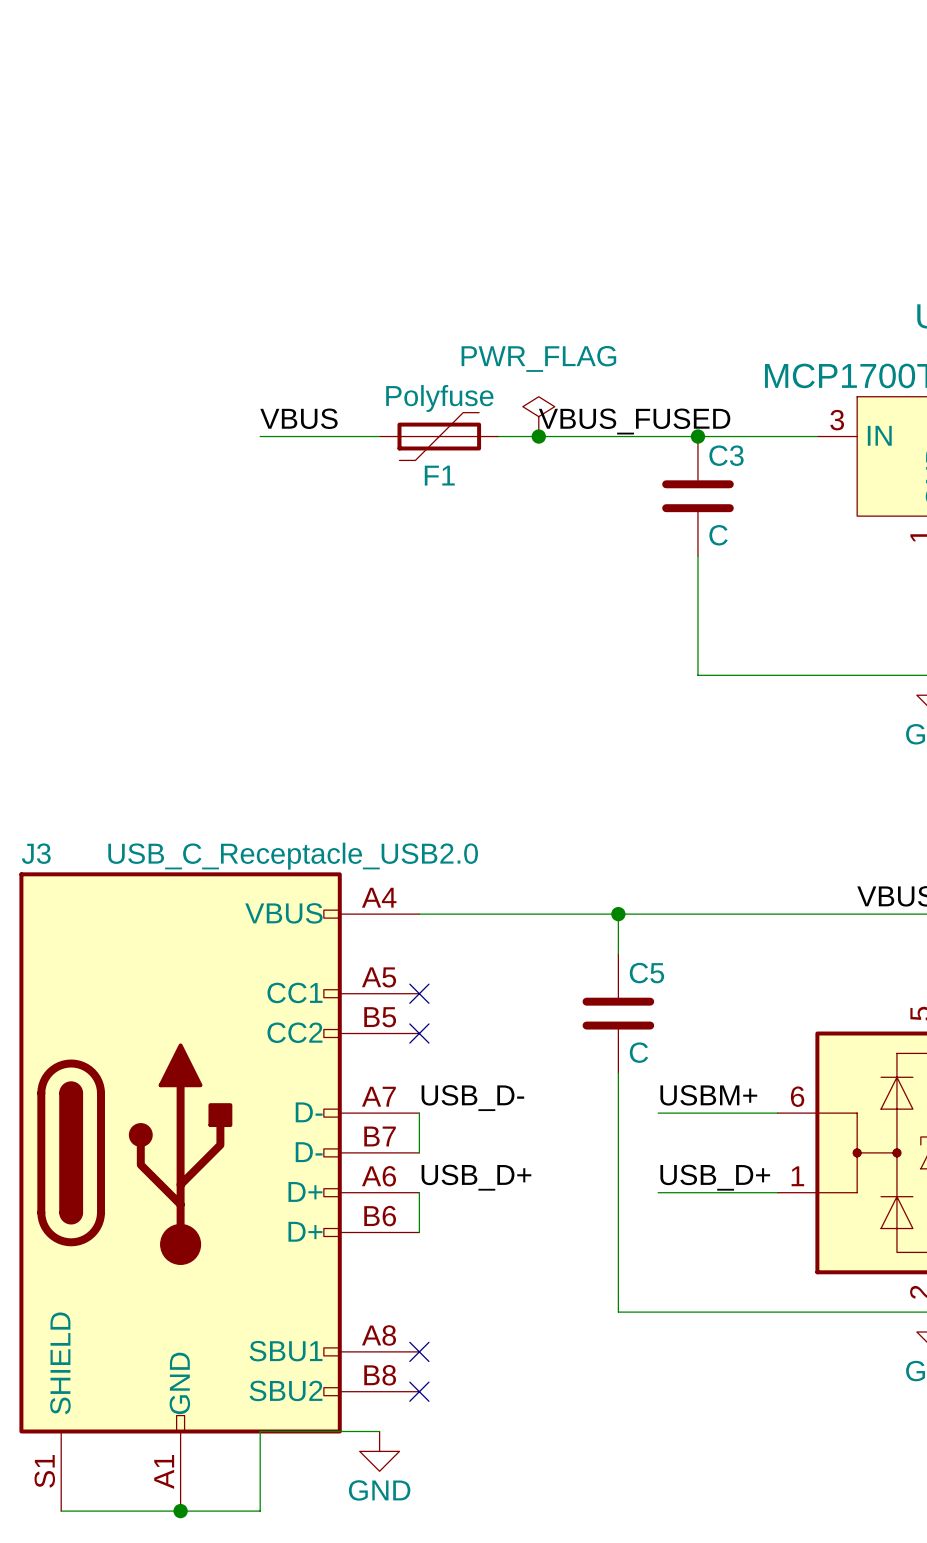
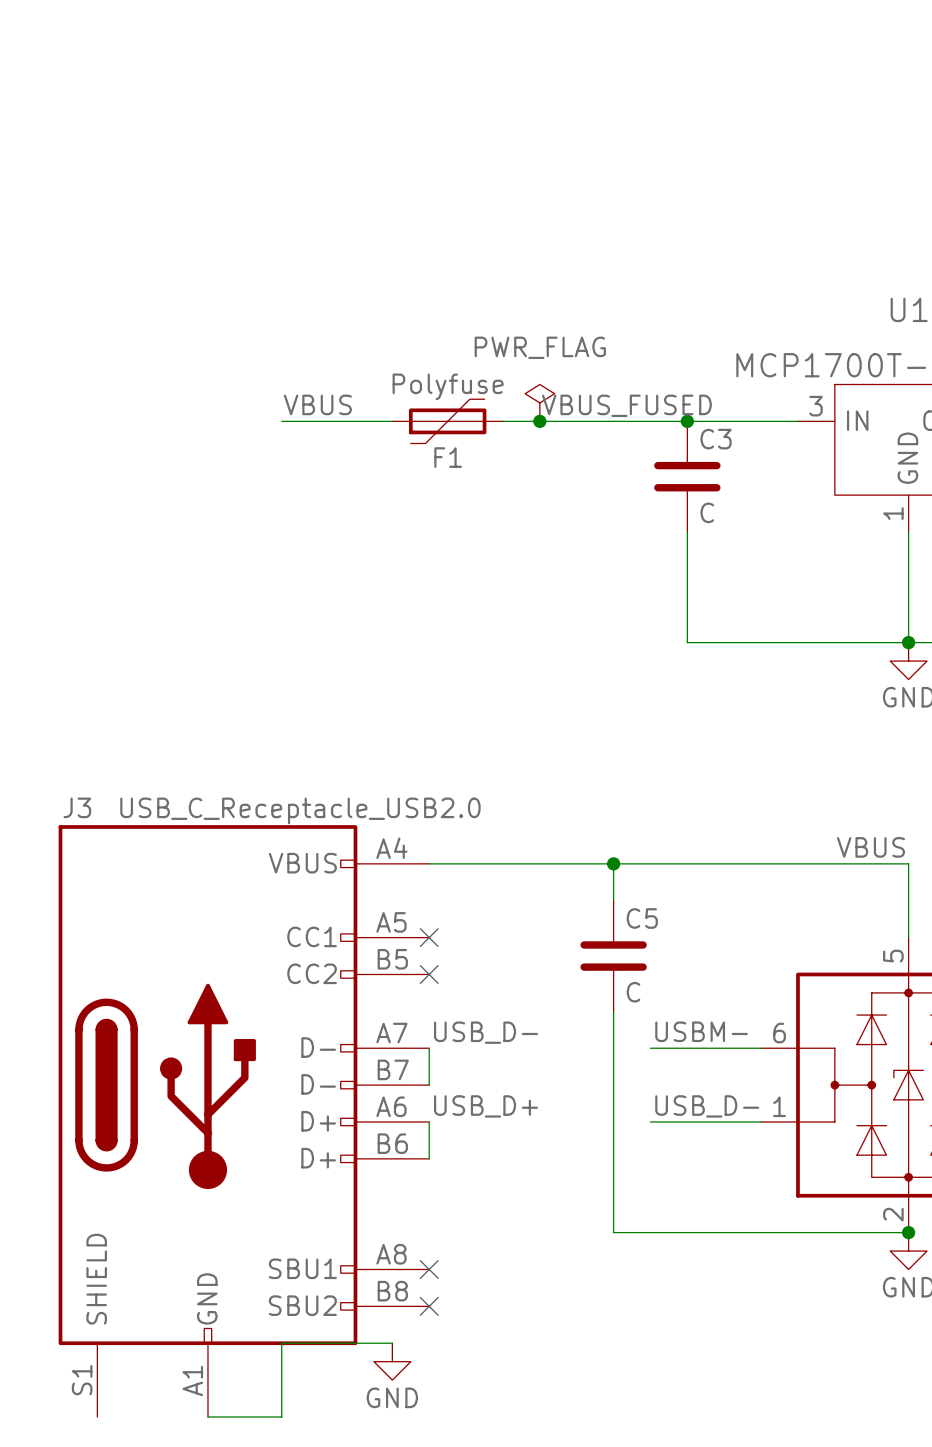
label: USBM+ (708, 1095) -> USBM- (701, 1031)
label: USB_D+ (715, 1177) -> USB_D- (707, 1106)
wire: (61, 1511) (180, 1511) -> none
junction: (180, 1511) -> none

